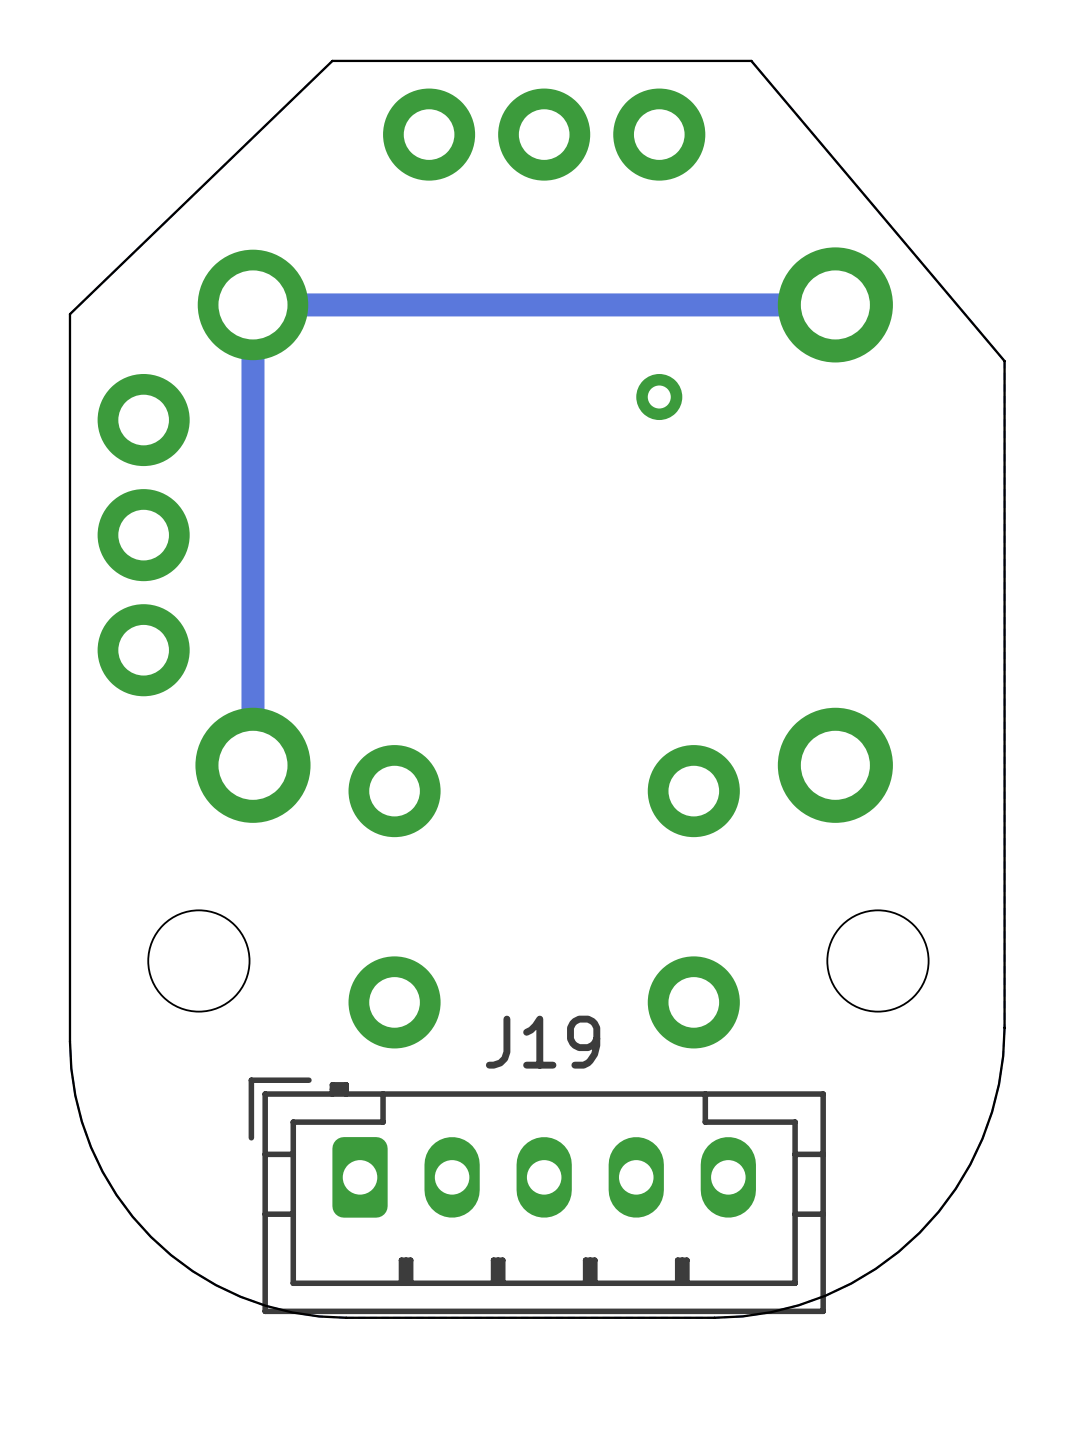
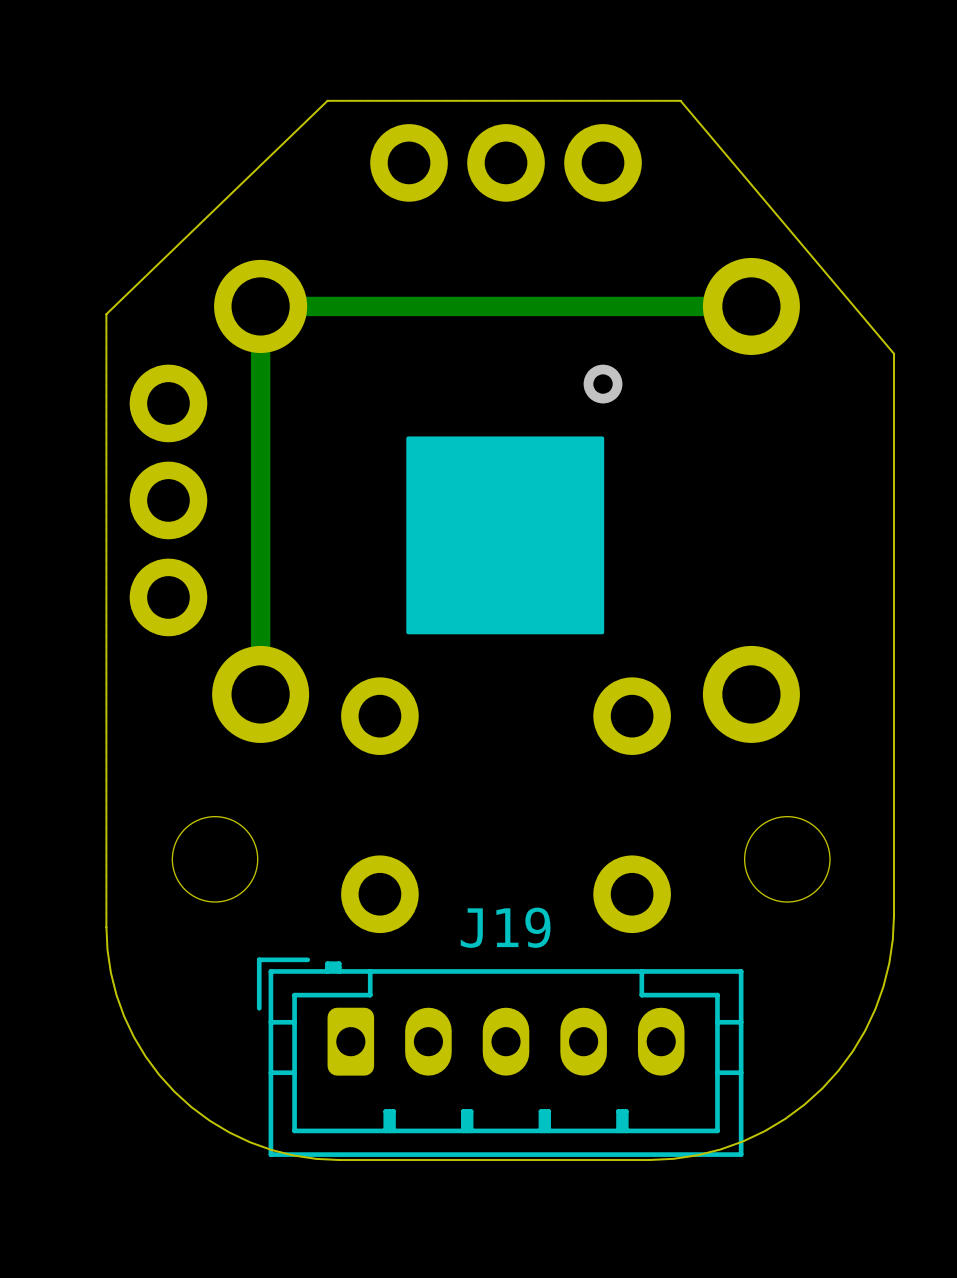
drawing: none -> [406, 436, 605, 635]

